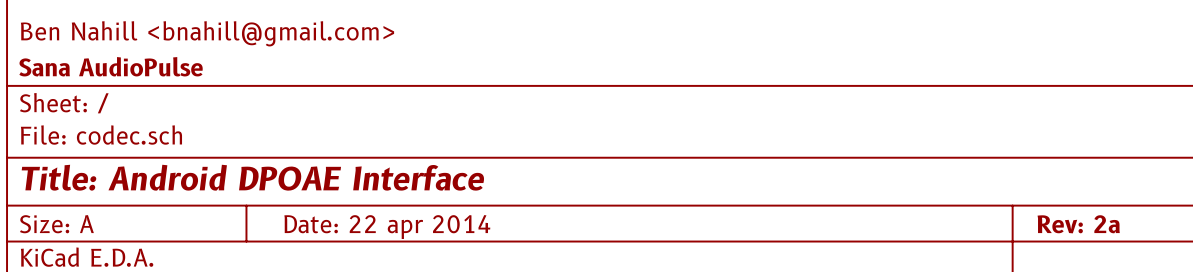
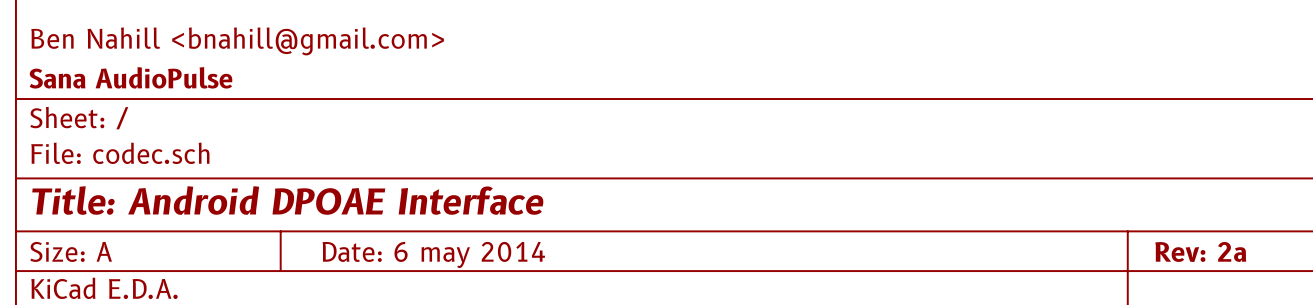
title block: Date: 22 apr 2014 (387, 227) -> Date: 6 may 2014 (433, 254)

